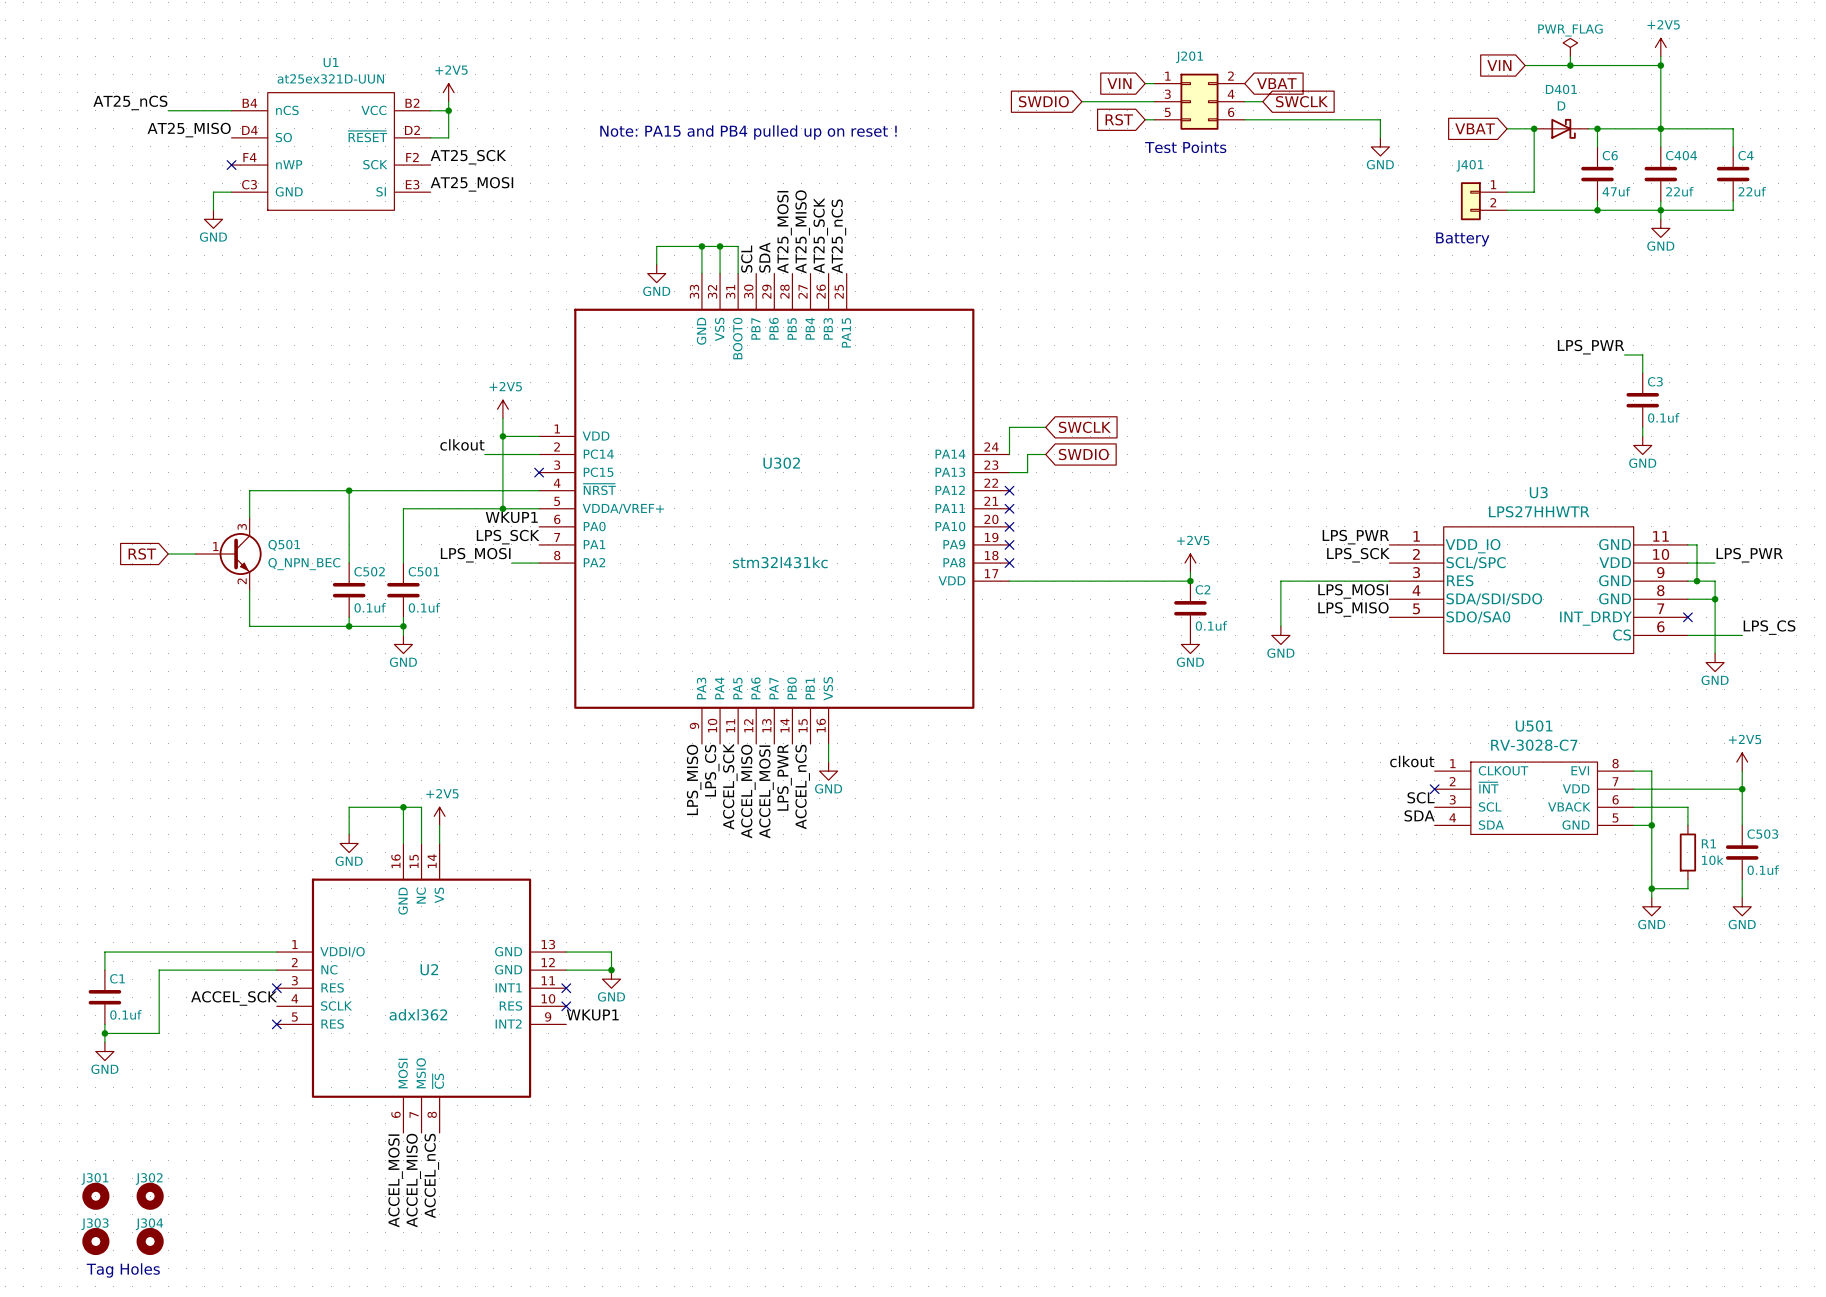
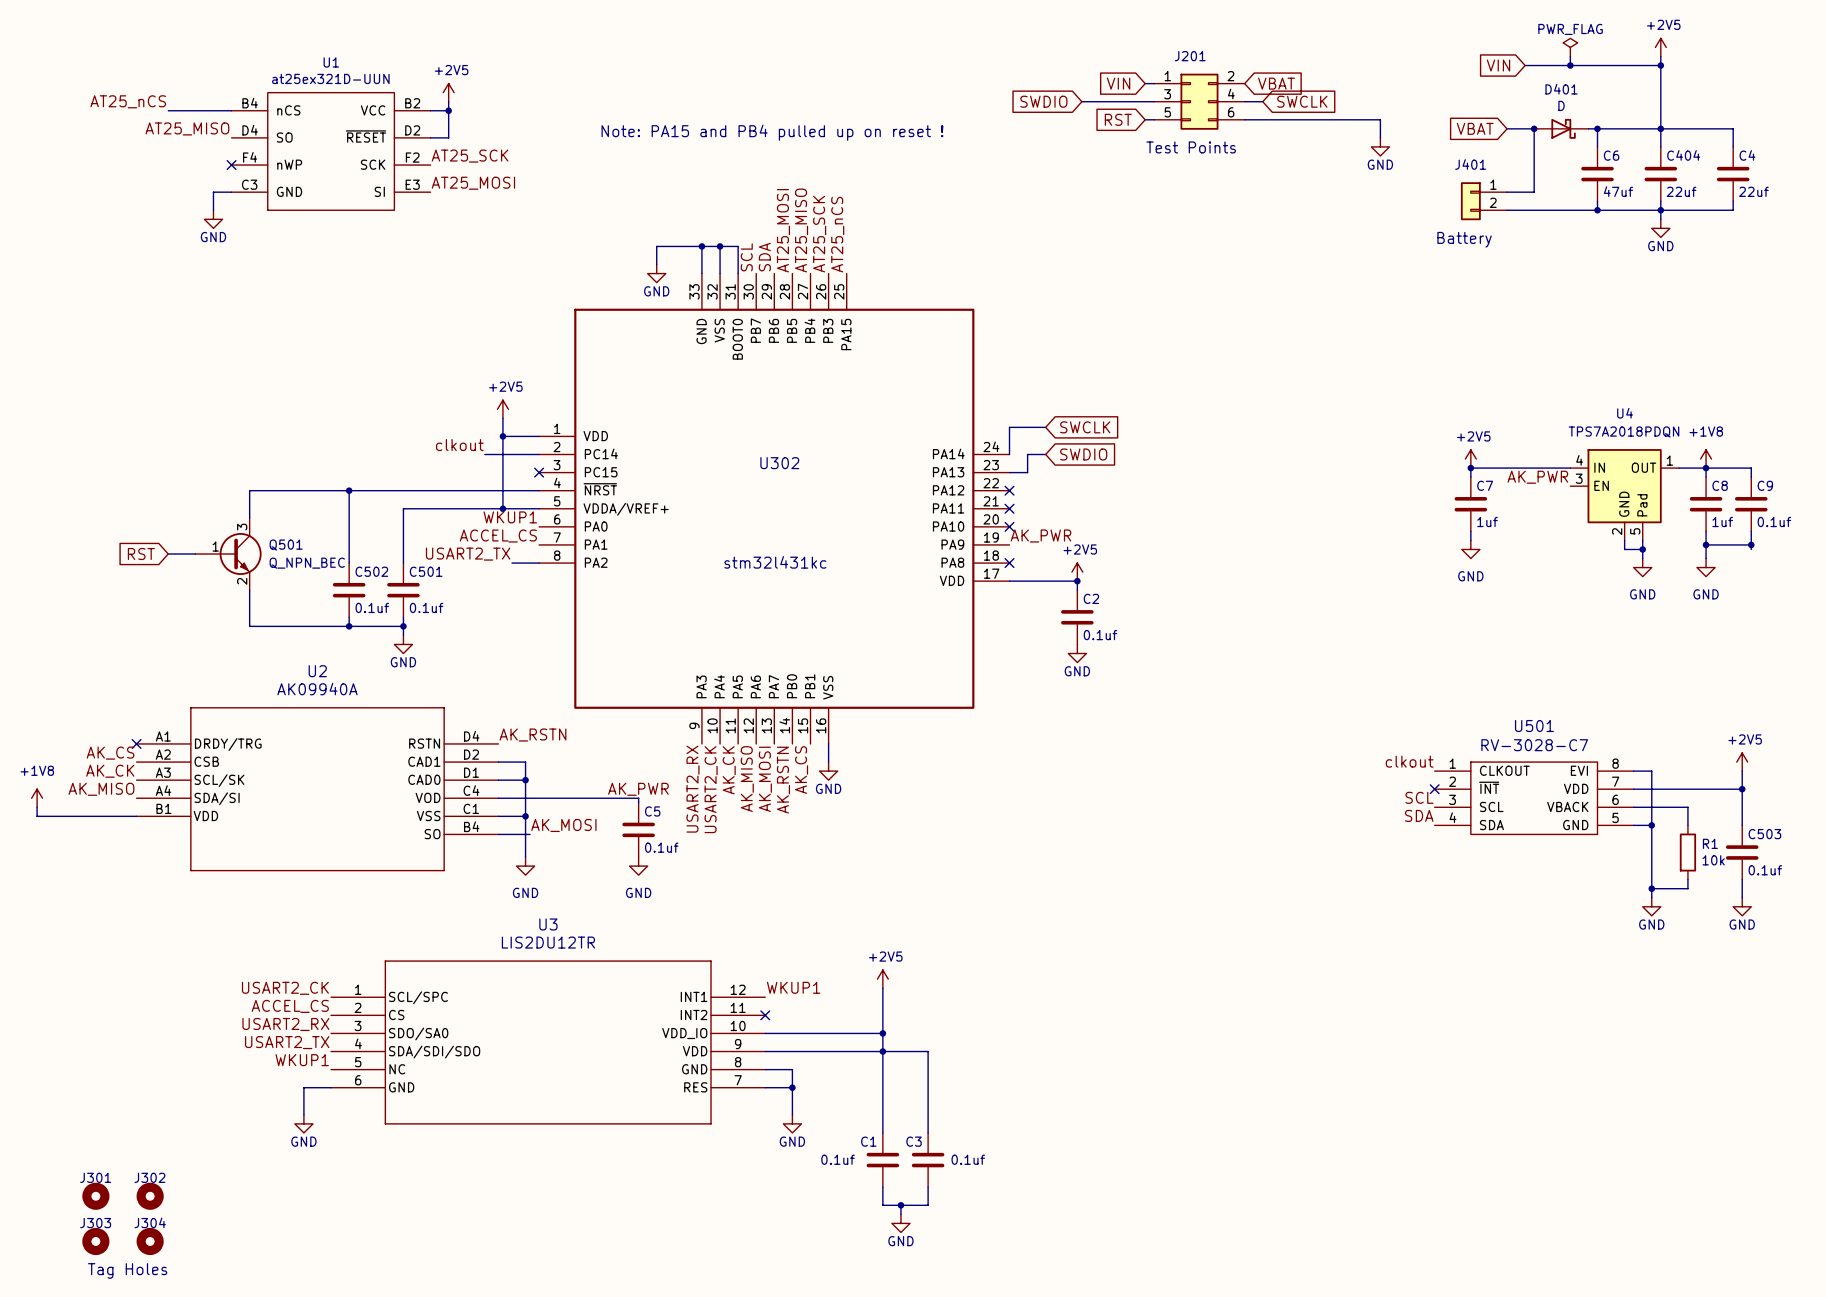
label: LPS_PWR (1591, 347) -> none
wire: (1624, 354) (1642, 354) (1642, 373) -> none
C3 name position: C3 (1655, 381) -> C3 (914, 1141)
C3 position: (1642, 400) -> (928, 1160)
C3 value position: 0.1uf (1663, 417) -> 0.1uf (968, 1159)
wire: (1642, 427) (1642, 436) -> (1706, 468) (1706, 477)
power symbol: GND (1642, 445) -> none
power symbol: none -> +2V5 (1470, 459)
power symbol: none -> +1V8 (1706, 459)
junction: none -> (1470, 468)
wire: none -> (1570, 468) (1470, 468) (1470, 477)
wire: none -> (1678, 468) (1751, 468) (1751, 477)
junction: none -> (1706, 468)
label: none -> AK_PWR (1537, 477)
U3 name position: U3 (1538, 492) -> U3 (548, 924)
U4: none -> TPS7A2018PDQN (1624, 494)
C7: none -> 1uf (1470, 504)
C8: none -> 1uf (1706, 504)
C9: none -> 0.1uf (1751, 504)
U3 value: LPS27HHWTR (1539, 511) -> LIS2DU12TR (548, 942)
U3 symbol: [1389, 526, 1688, 654] -> [331, 960, 766, 1125]
wire: none -> (1470, 531) (1470, 540)
wire: none -> (1706, 531) (1706, 558)
wire: none -> (1751, 531) (1751, 549)
label: LPS_SCK (508, 537) -> ACCEL_CS (498, 536)
label: none -> AK_PWR (1040, 536)
label: LPS_PWR (1355, 537) -> none
wire: none -> (1624, 540) (1624, 549) (1642, 549)
wire: none -> (1642, 540) (1642, 558)
no-connect mark: (1009, 544) -> none
wire: (1687, 544) (1696, 544) (1696, 581) -> none
wire: none -> (1706, 544) (1751, 544)
junction: none -> (1706, 544)
junction: none -> (1751, 544)
power symbol: none -> GND (1470, 549)
junction: none -> (1642, 549)
label: LPS_MOSI (475, 555) -> USART2_TX (468, 554)
label: LPS_SCK (1358, 555) -> none
label: LPS_PWR (1749, 555) -> none
power symbol position: +2V5 (1190, 563) -> +2V5 (1077, 572)
wire: (1687, 563) (1715, 563) -> none
power symbol: none -> GND (1642, 567)
power symbol: none -> GND (1706, 567)
wire: (1190, 572) (1190, 581) (1077, 581) -> (1077, 590) (1077, 581)
junction: none -> (1077, 581)
junction: (1190, 581) -> none
wire: (1389, 581) (1280, 581) (1280, 626) -> none
wire: (1687, 581) (1715, 581) (1715, 653) -> none
junction: (1696, 581) -> none
label: LPS_MOSI (1353, 591) -> none
wire: (1687, 599) (1715, 599) -> none
junction: (1715, 599) -> none
C2 position: (1190, 608) -> (1077, 617)
label: LPS_MISO (1353, 609) -> none
no-connect mark: (1687, 617) -> none
label: LPS_CS (1769, 627) -> none
power symbol: GND (1280, 635) -> none
wire: (1687, 635) (1742, 635) -> none
power symbol: GND (1190, 644) -> none
power symbol: none -> GND (1077, 653)
power symbol: GND (1715, 662) -> none
label: none -> AK_RSTN (532, 735)
no-connect mark: none -> (136, 743)
label: none -> AK_CS (110, 753)
wire: none -> (498, 762) (525, 762) (525, 857)
label: LPS_CS (712, 770) -> USART2_CK (711, 789)
label: none -> AK_CK (110, 771)
label: LPS_PWR (784, 777) -> AK_RSTN (783, 780)
label: LPS_MISO (694, 779) -> USART2_RX (692, 789)
wire: none -> (498, 780) (525, 780)
junction: none -> (525, 780)
label: ACCEL_SCK (730, 786) -> AK_CK (729, 770)
label: ACCEL_nCS (802, 787) -> AK_CS (801, 770)
label: none -> AK_MISO (101, 789)
label: none -> AK_PWR (638, 789)
label: ACCEL_MISO (748, 791) -> AK_MISO (747, 779)
label: ACCEL_MOSI (766, 791) -> AK_MOSI (765, 779)
power symbol: none -> +1V8 (37, 798)
wire: none -> (498, 798) (638, 798) (638, 802)
wire: none -> (37, 807) (37, 816) (136, 816)
wire: (403, 807) (403, 843) -> none
junction: (403, 807) -> none
power symbol: +2V5 (439, 816) -> none
wire: none -> (498, 816) (525, 816)
junction: none -> (525, 816)
wire: (439, 825) (439, 843) -> none
label: none -> AK_MOSI (563, 825)
C5: none -> 0.1uf (638, 829)
wire: (349, 834) (349, 807) (421, 807) (421, 843) -> none
wire: none -> (498, 834) (530, 834)
U2 symbol: [276, 843, 567, 1133] -> [136, 707, 499, 872]
power symbol: GND (349, 843) -> none
power symbol: none -> GND (525, 866)
power symbol: none -> GND (638, 866)
wire: (276, 952) (104, 952) (104, 970) -> none
wire: (566, 952) (611, 952) (611, 970) (566, 970) -> none
U2 name position: U2 (429, 969) -> U2 (317, 671)
wire: (276, 970) (159, 970) (159, 1033) (104, 1033) -> none
junction: (611, 970) -> none
C1 name position: C1 (117, 978) -> C1 (868, 1141)
power symbol: GND (611, 979) -> none
power symbol: none -> +2V5 (882, 979)
label: none -> WKUP1 (793, 987)
no-connect mark: (276, 988) -> none
no-connect mark: (566, 988) -> none
wire: none -> (882, 988) (882, 1132)
label: none -> USART2_CK (285, 988)
C1 position: (104, 997) -> (882, 1160)
label: ACCEL_SCK (234, 998) -> ACCEL_CS (290, 1006)
no-connect mark: (566, 1006) -> none
C1 value position: 0.1uf (125, 1014) -> 0.1uf (838, 1159)
U2 value: adxl362 (418, 1014) -> AK09940A (317, 689)
label: WKUP1 (592, 1015) -> none
no-connect mark: none -> (765, 1015)
wire: (104, 1024) (104, 1042) -> none
no-connect mark: (276, 1024) -> none
label: none -> USART2_RX (285, 1024)
junction: (104, 1033) -> none
wire: none -> (765, 1033) (882, 1033)
junction: none -> (882, 1033)
label: none -> USART2_TX (287, 1042)
power symbol: GND (104, 1051) -> none
wire: none -> (765, 1051) (928, 1051) (928, 1132)
junction: none -> (882, 1051)
label: none -> WKUP1 (302, 1060)
wire: none -> (765, 1069) (792, 1069) (792, 1114)
wire: none -> (331, 1087) (303, 1087) (303, 1114)
wire: none -> (765, 1087) (792, 1087)
junction: none -> (792, 1087)
power symbol: none -> GND (303, 1123)
power symbol: none -> GND (792, 1123)
label: ACCEL_nCS (431, 1176) -> none
label: ACCEL_MOSI (395, 1180) -> none
label: ACCEL_MISO (413, 1180) -> none
wire: none -> (882, 1187) (882, 1205) (928, 1205) (928, 1187)
wire: none -> (900, 1205) (900, 1214)
junction: none -> (900, 1205)
power symbol: none -> GND (900, 1223)

